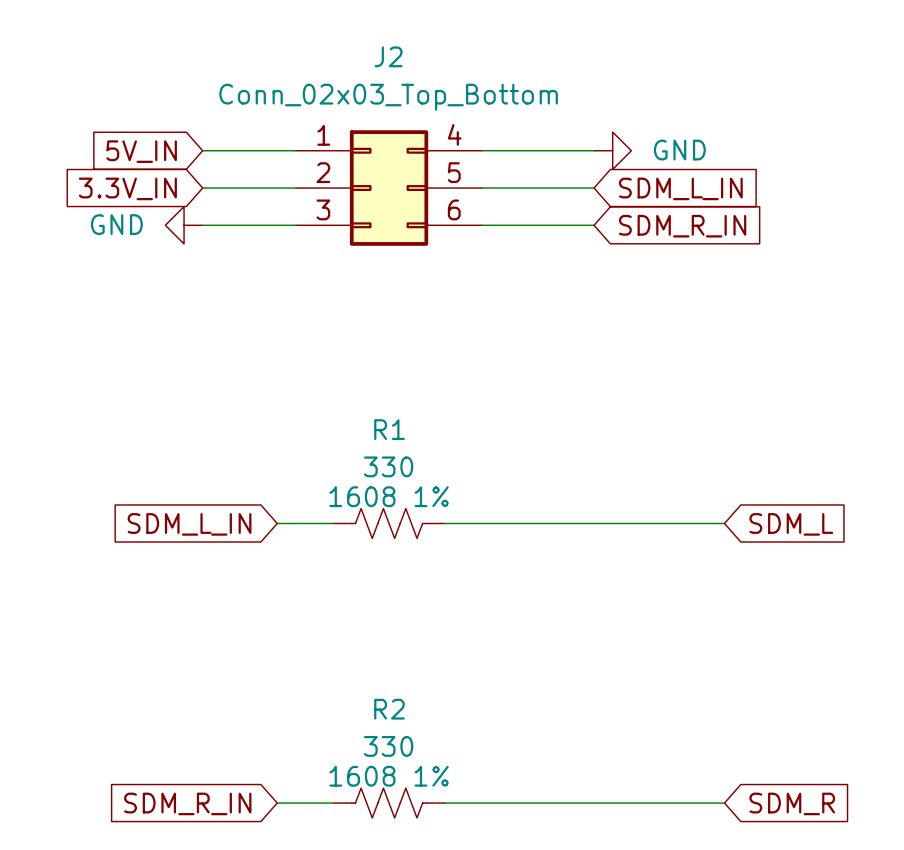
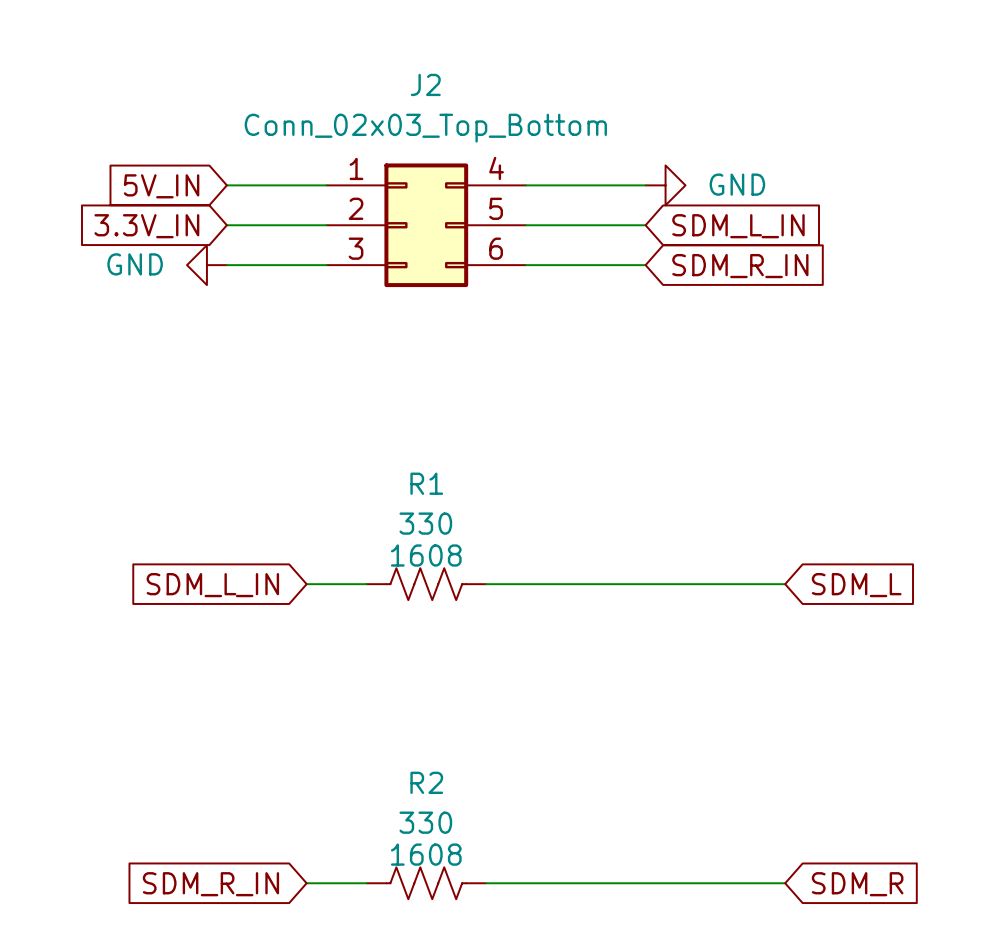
R1 text: 1608 1% (389, 496) -> 1608 (426, 555)
R2 text: 1608 1% (389, 776) -> 1608 (426, 854)

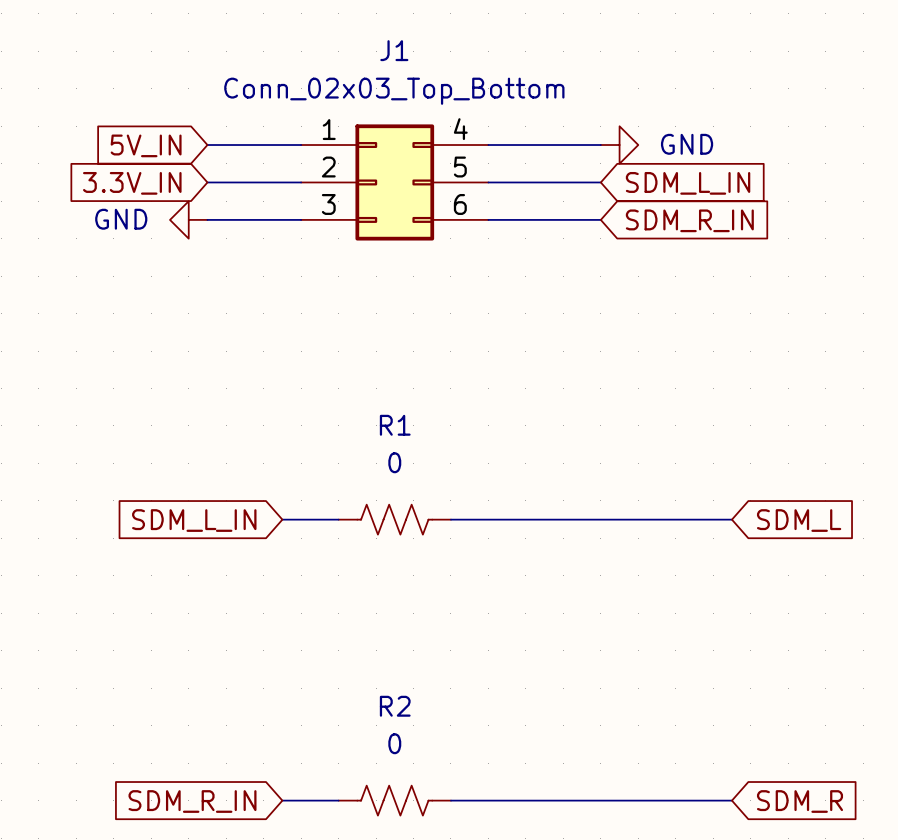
J2 name: J2 (425, 84) -> J1 (394, 50)
R1 value: 330 (425, 523) -> 0 (394, 462)
R1 text: 1608 (426, 555) -> none
R2 value: 330 (425, 822) -> 0 (394, 743)
R2 text: 1608 (426, 854) -> none

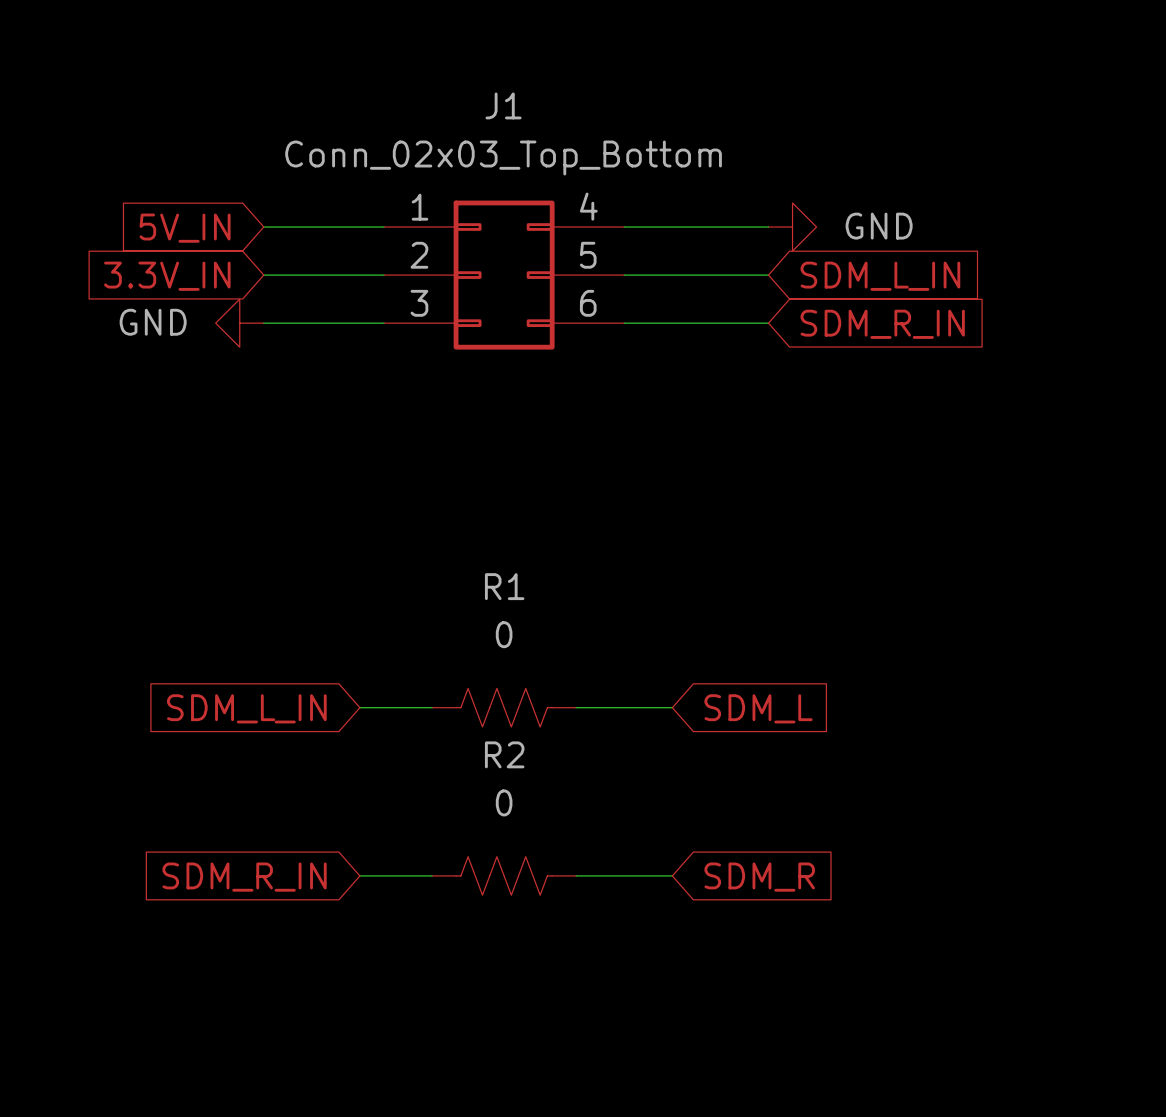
wire: (525, 519) (731, 519) -> none
global label position: SDM_L (799, 520) -> SDM_L (758, 708)
wire: none -> (576, 875) (672, 875)
wire: (282, 800) (338, 800) -> (359, 875) (432, 875)
R2 position: (394, 800) -> (504, 875)
wire: (450, 800) (731, 800) -> none
global label position: SDM_R_IN (192, 801) -> SDM_R_IN (244, 877)
global label position: SDM_R (800, 801) -> SDM_R (759, 877)

